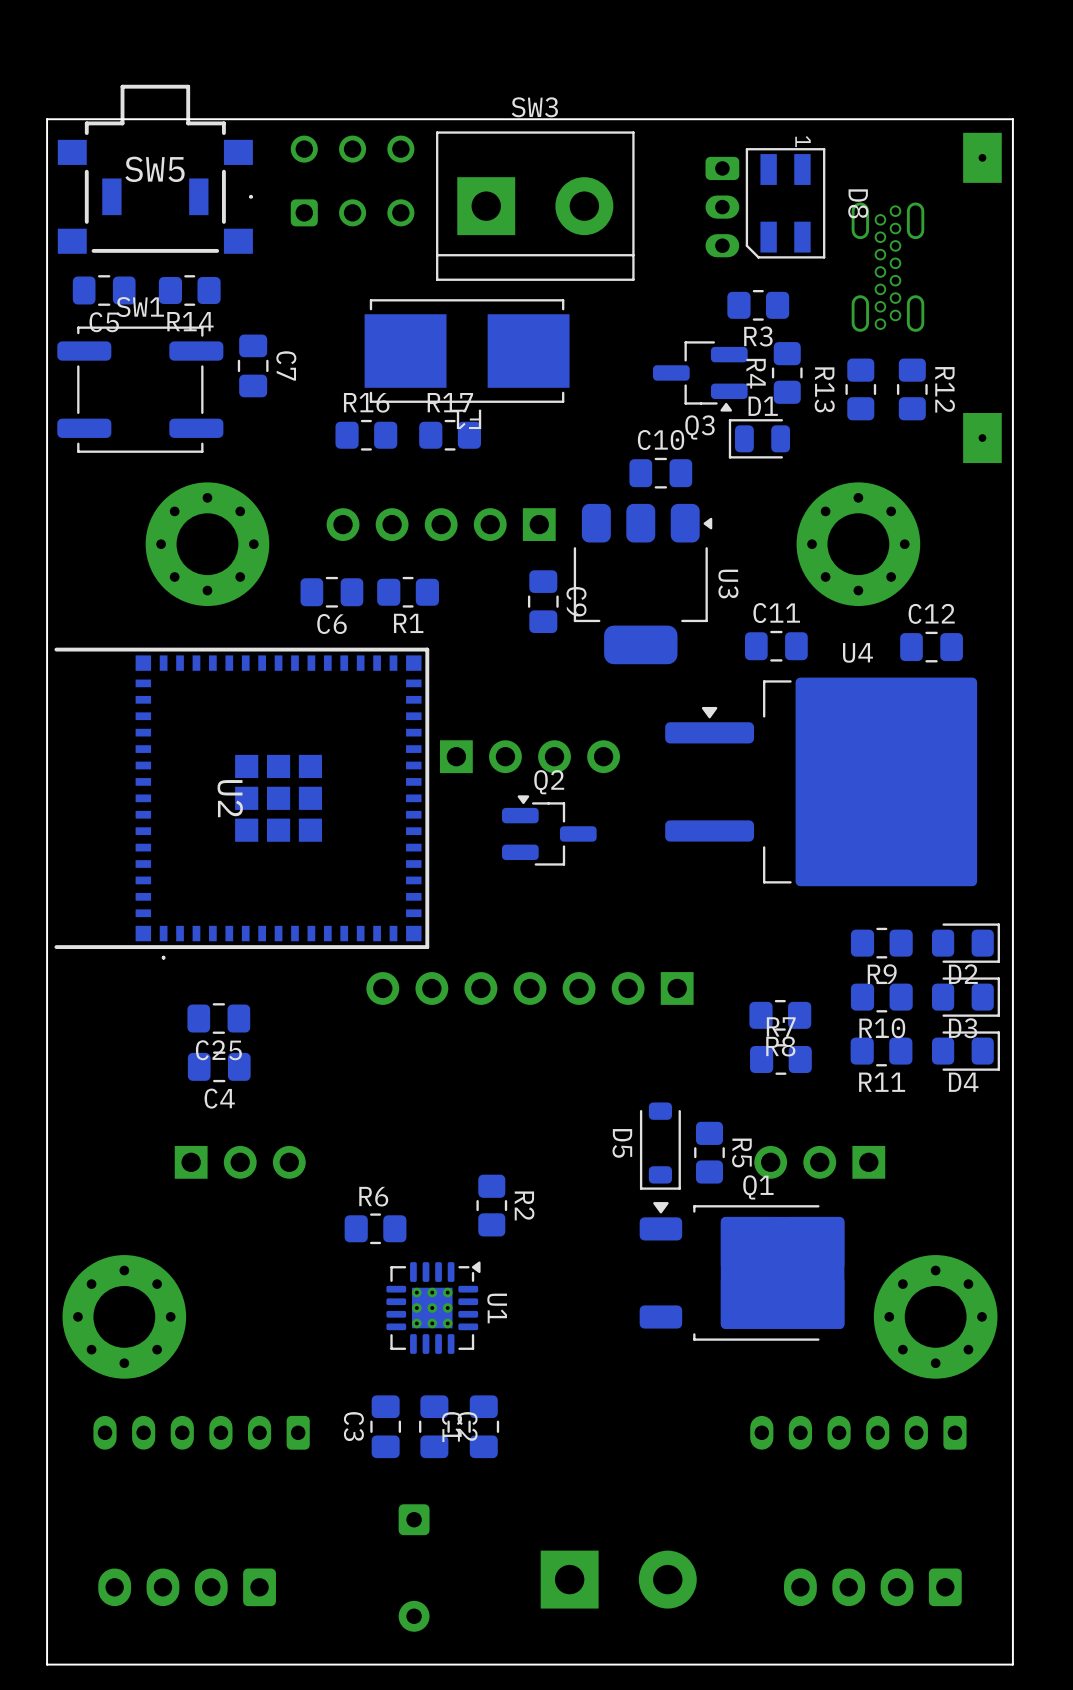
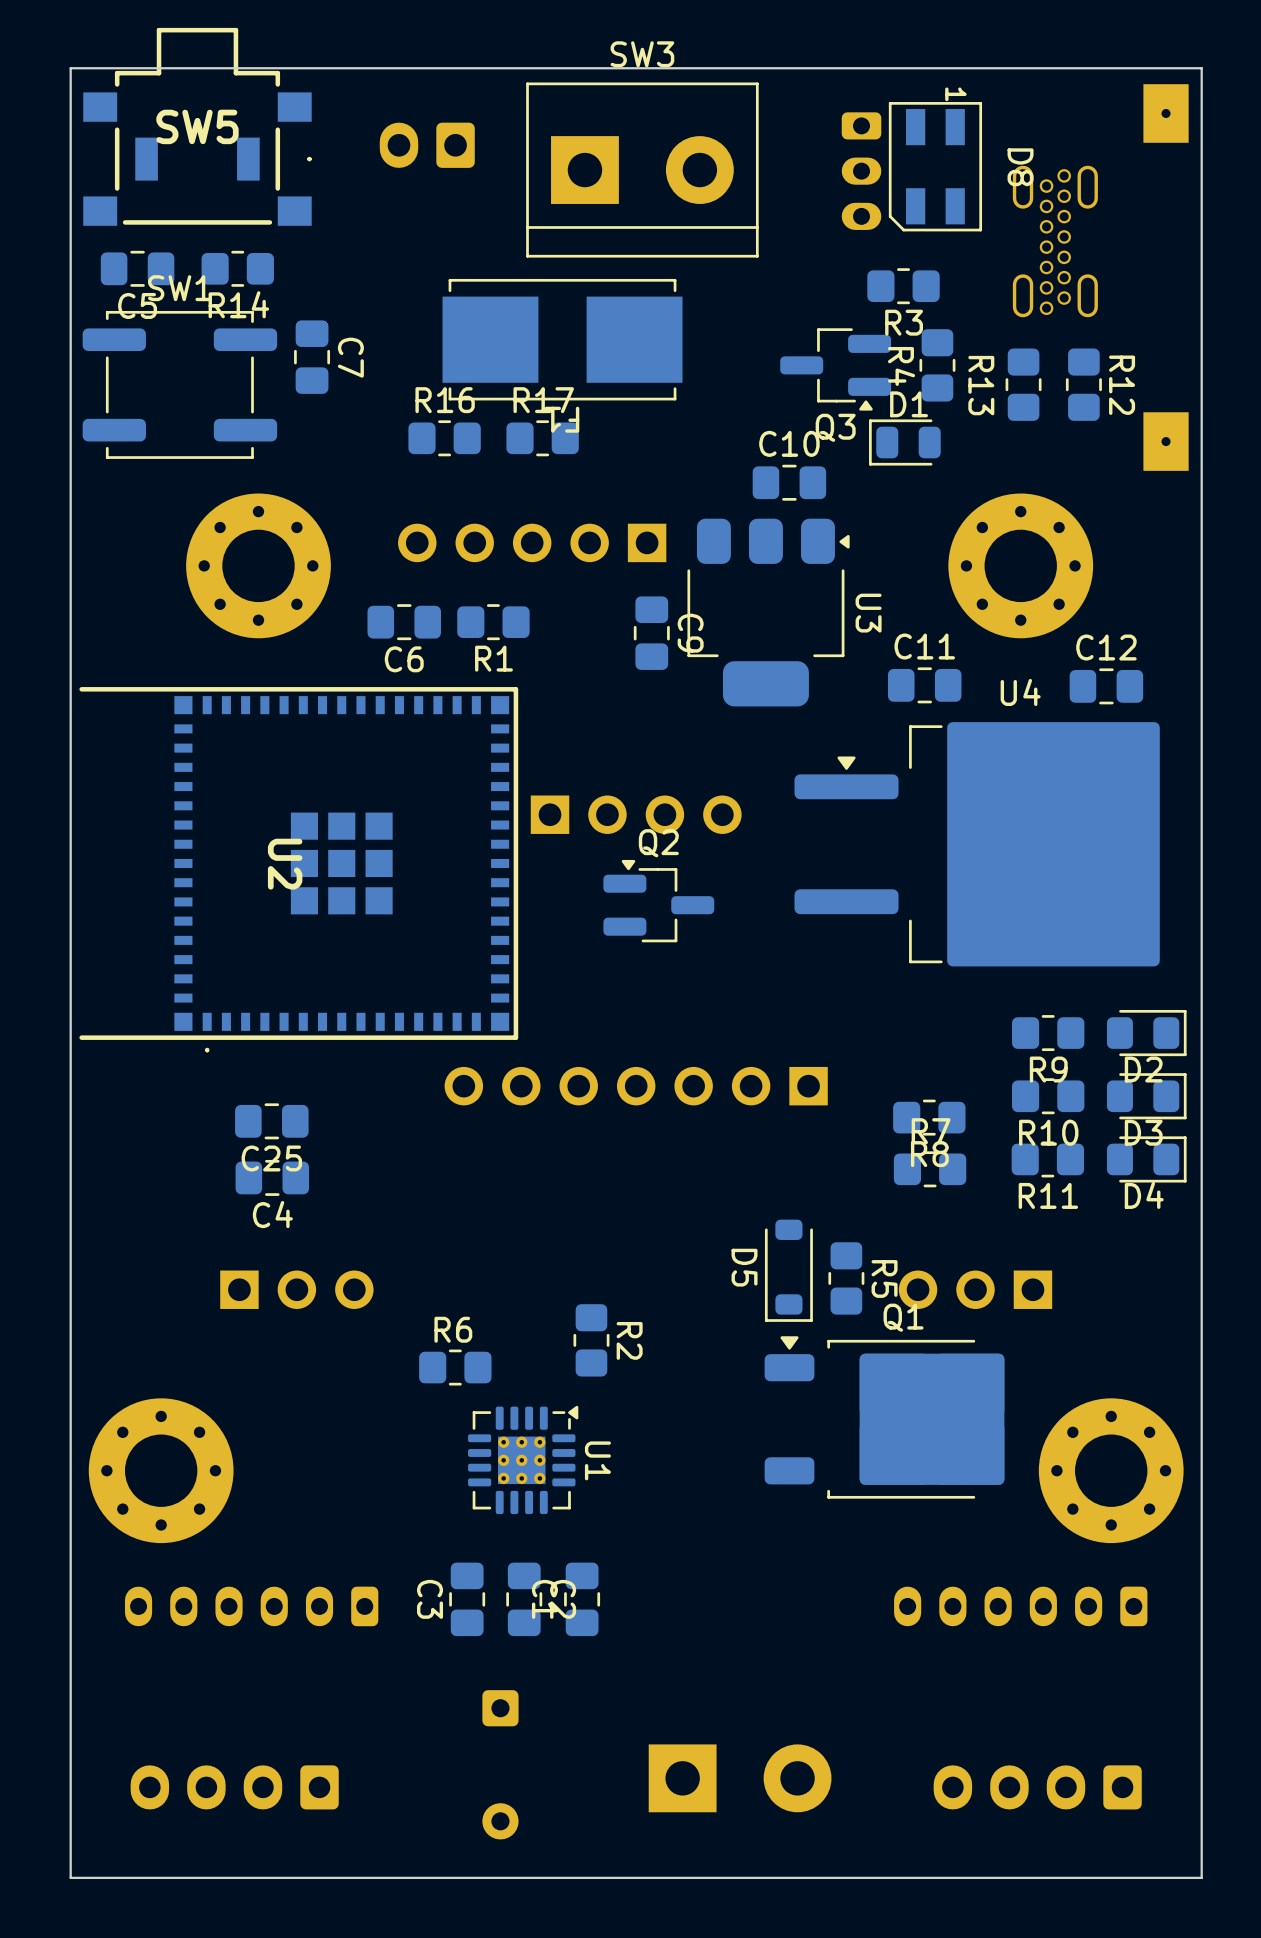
part footprint: [290, 135, 415, 227] -> [379, 122, 475, 168]

